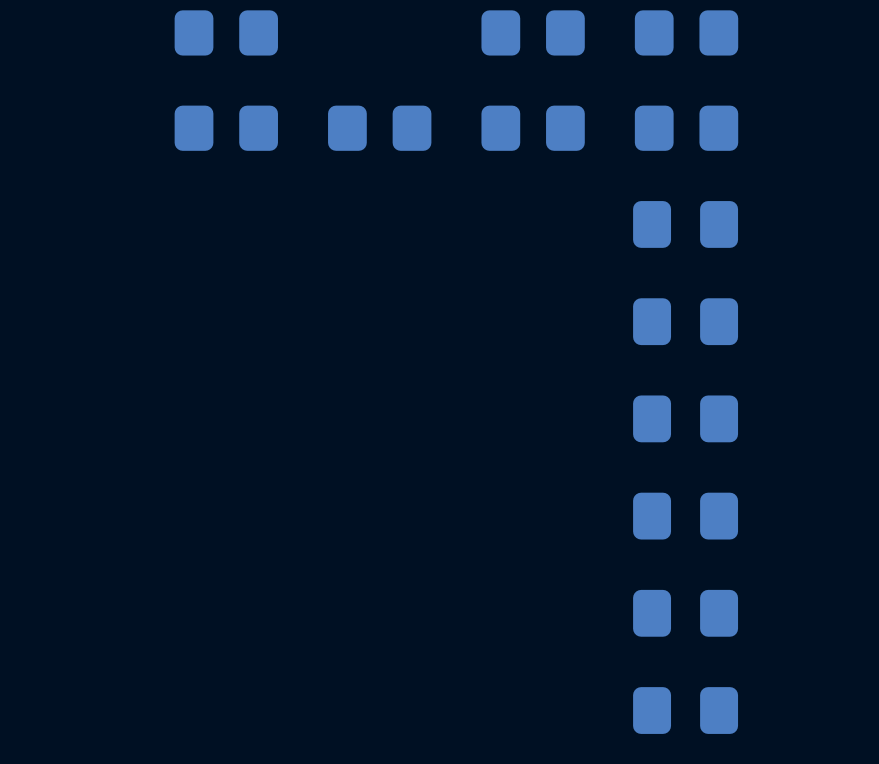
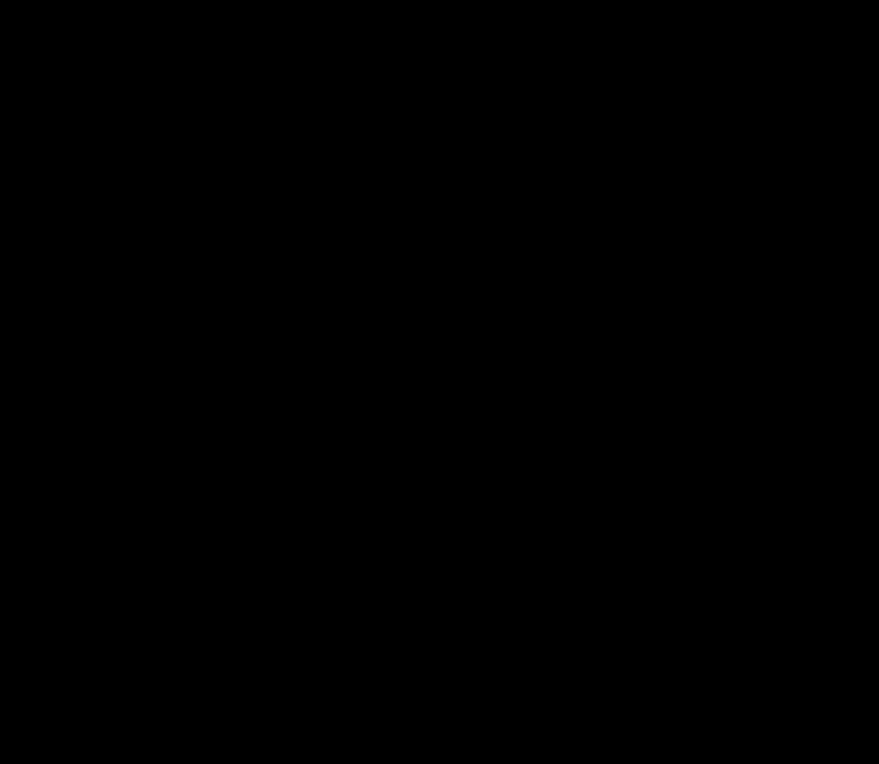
part: (226, 32) -> none
part: (533, 32) -> none
part: (686, 32) -> none
part: (226, 128) -> none
part: (379, 128) -> none
part: (533, 128) -> none
part: (686, 128) -> none
part: (685, 224) -> none
part: (685, 321) -> none
part: (685, 418) -> none
part: (685, 516) -> none
part: (685, 613) -> none
part: (685, 710) -> none

